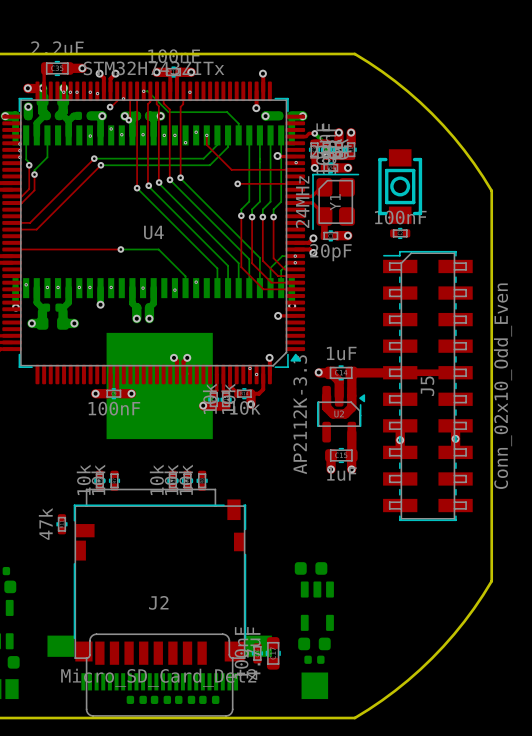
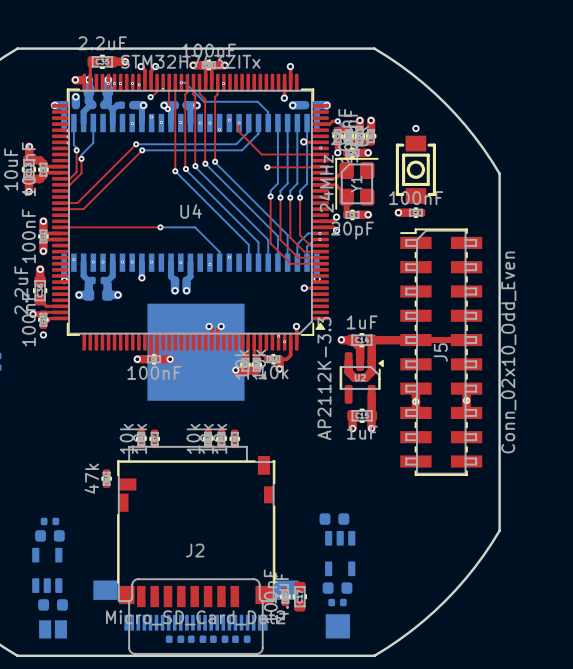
via: none -> (415, 128)
top track: none -> (398, 212) (410, 212)
via: none -> (398, 212)

